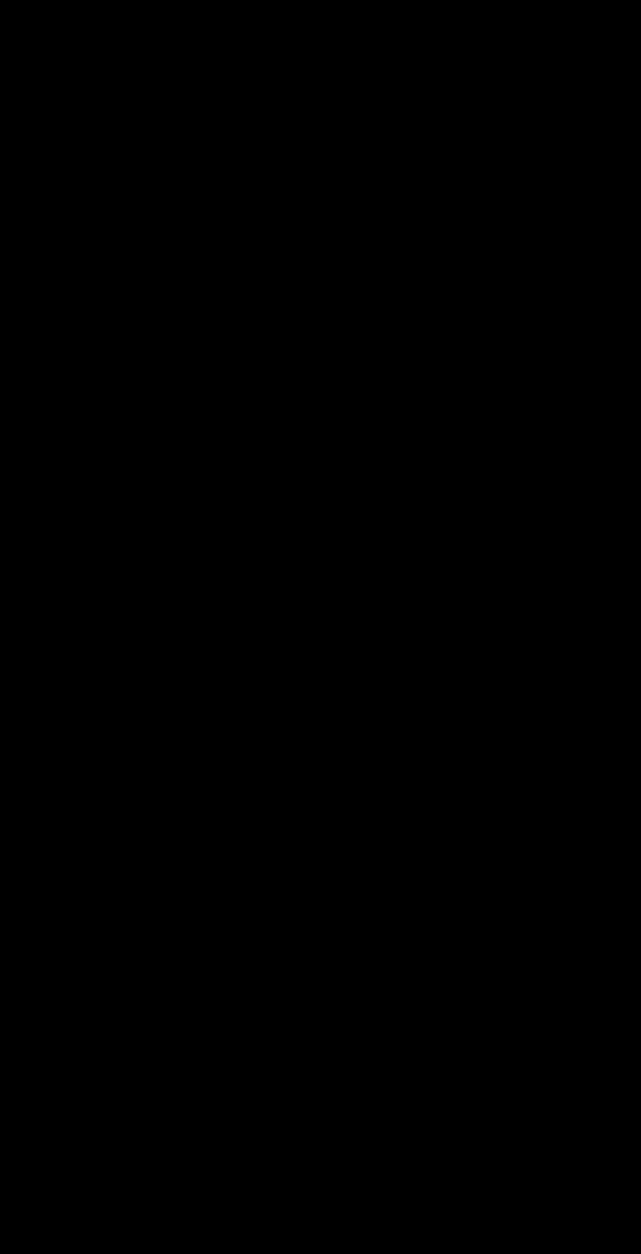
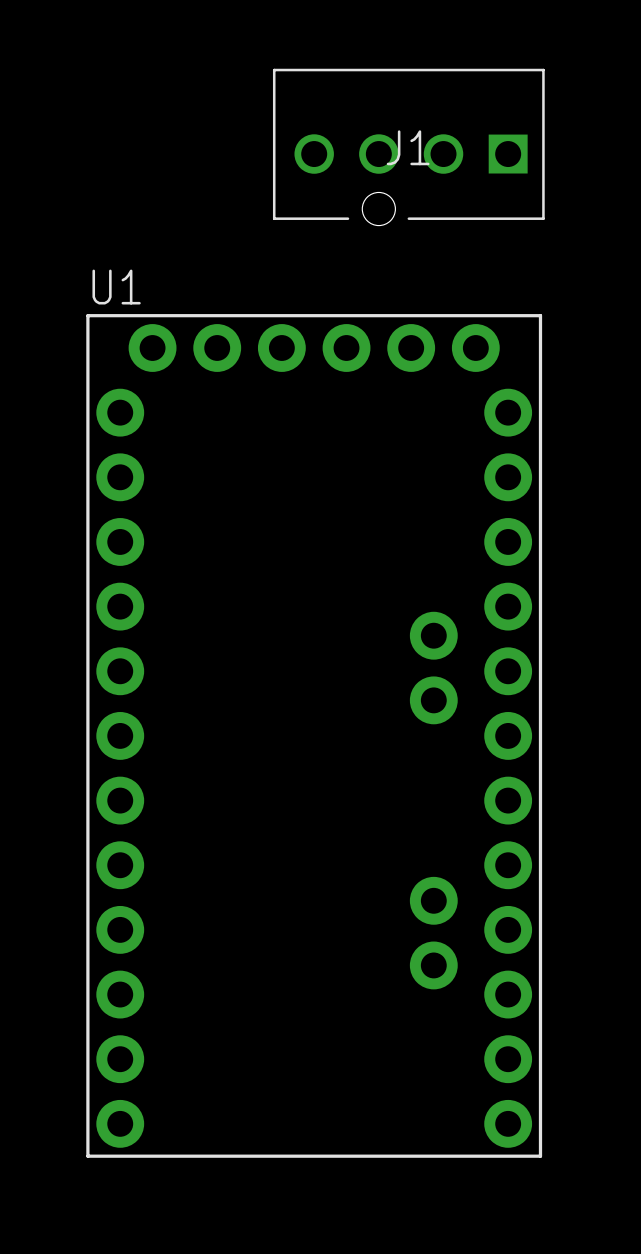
J1: none -> (408, 147)
U1: none -> (314, 735)

